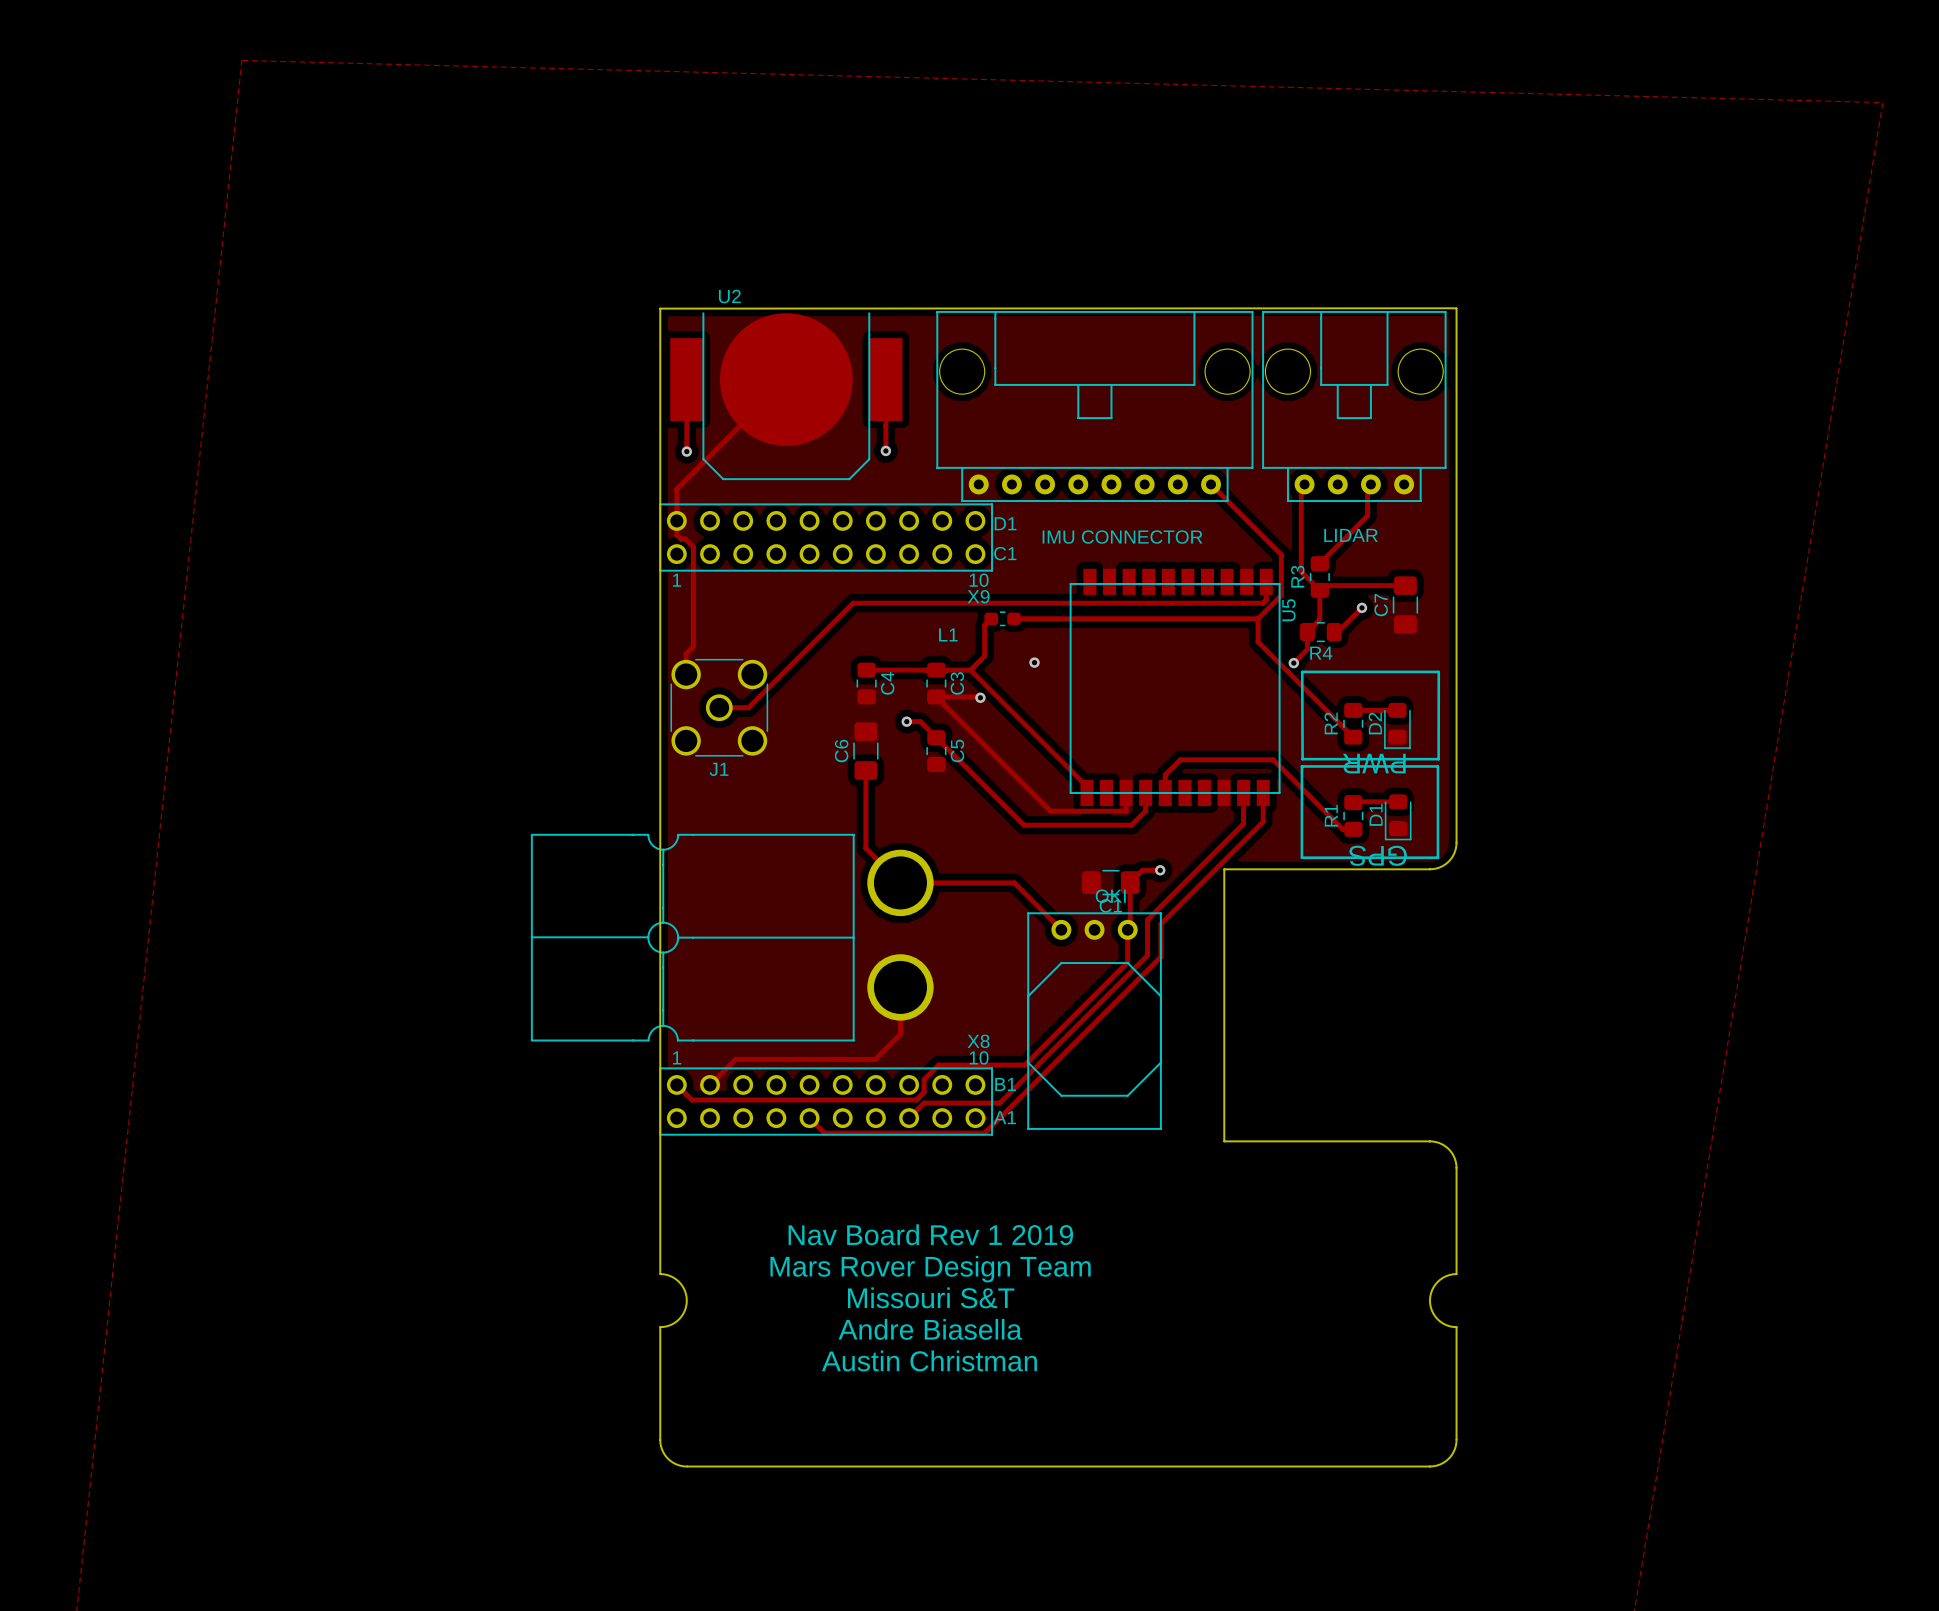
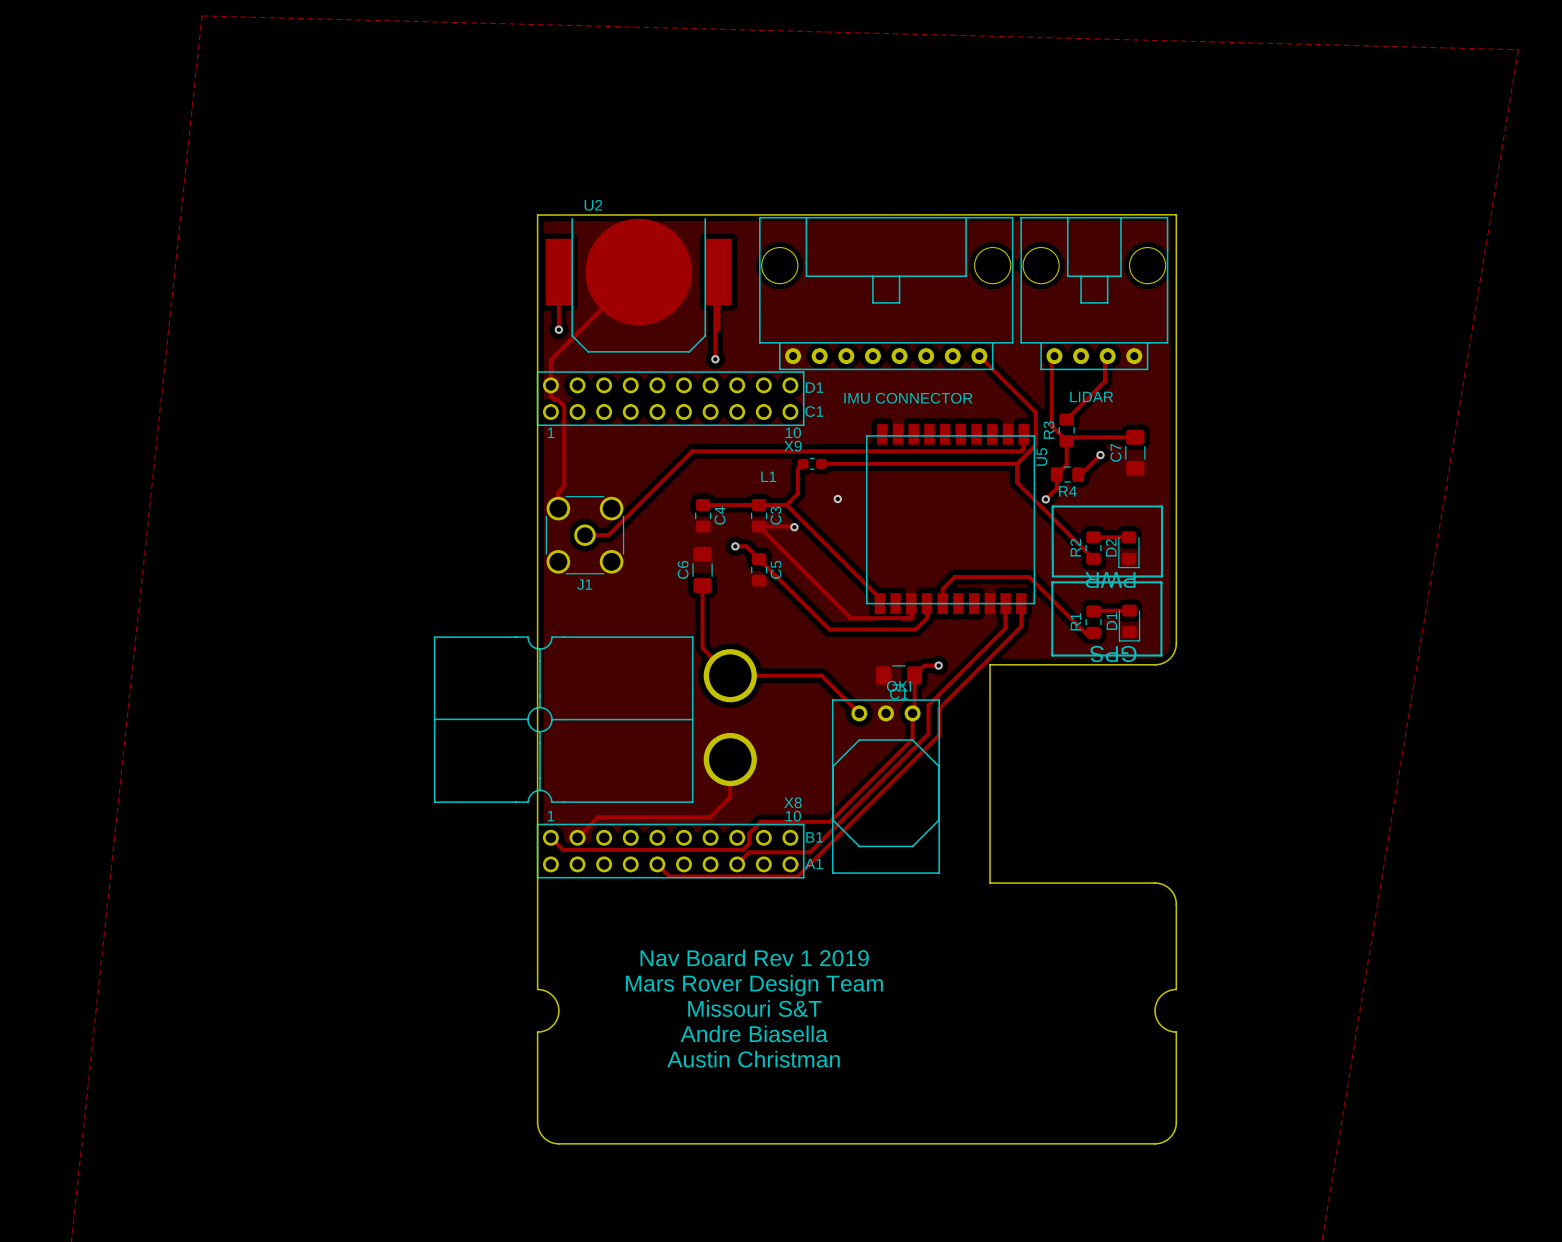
track: none -> (715, 275) (715, 359)
via position: (885, 450) -> (715, 359)

